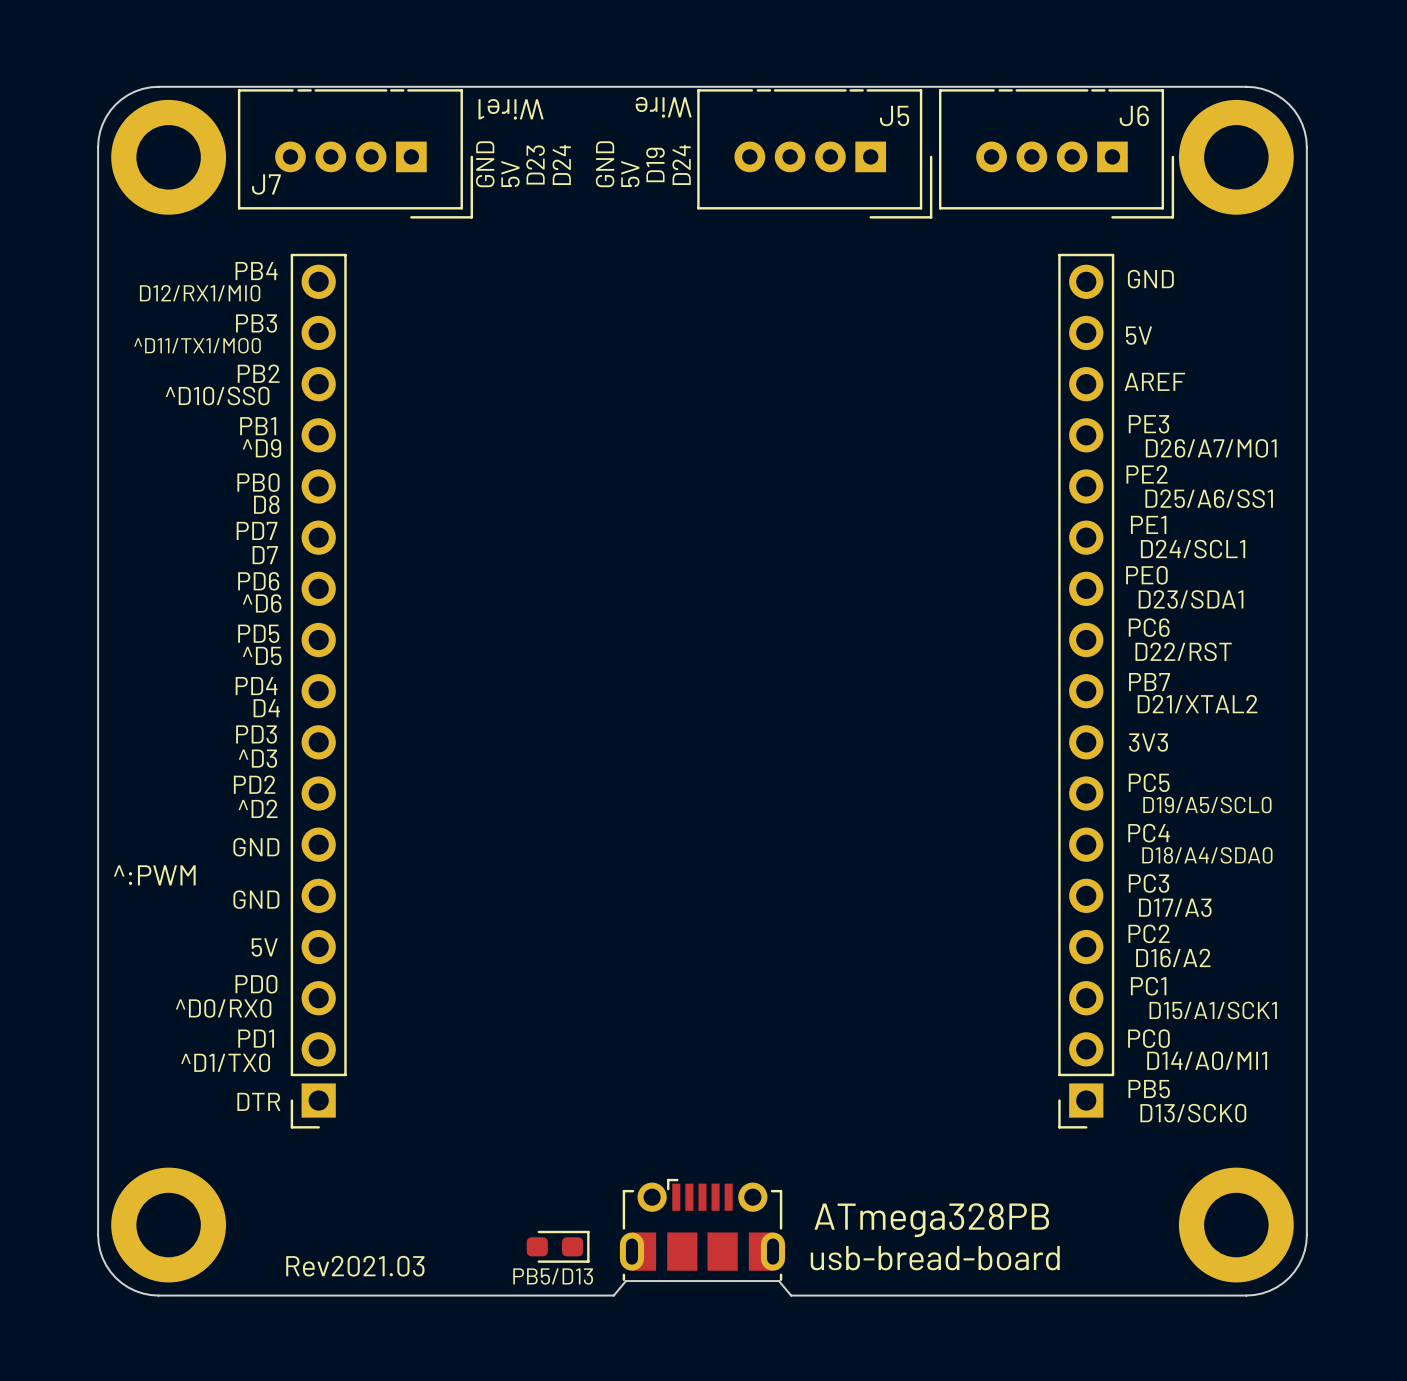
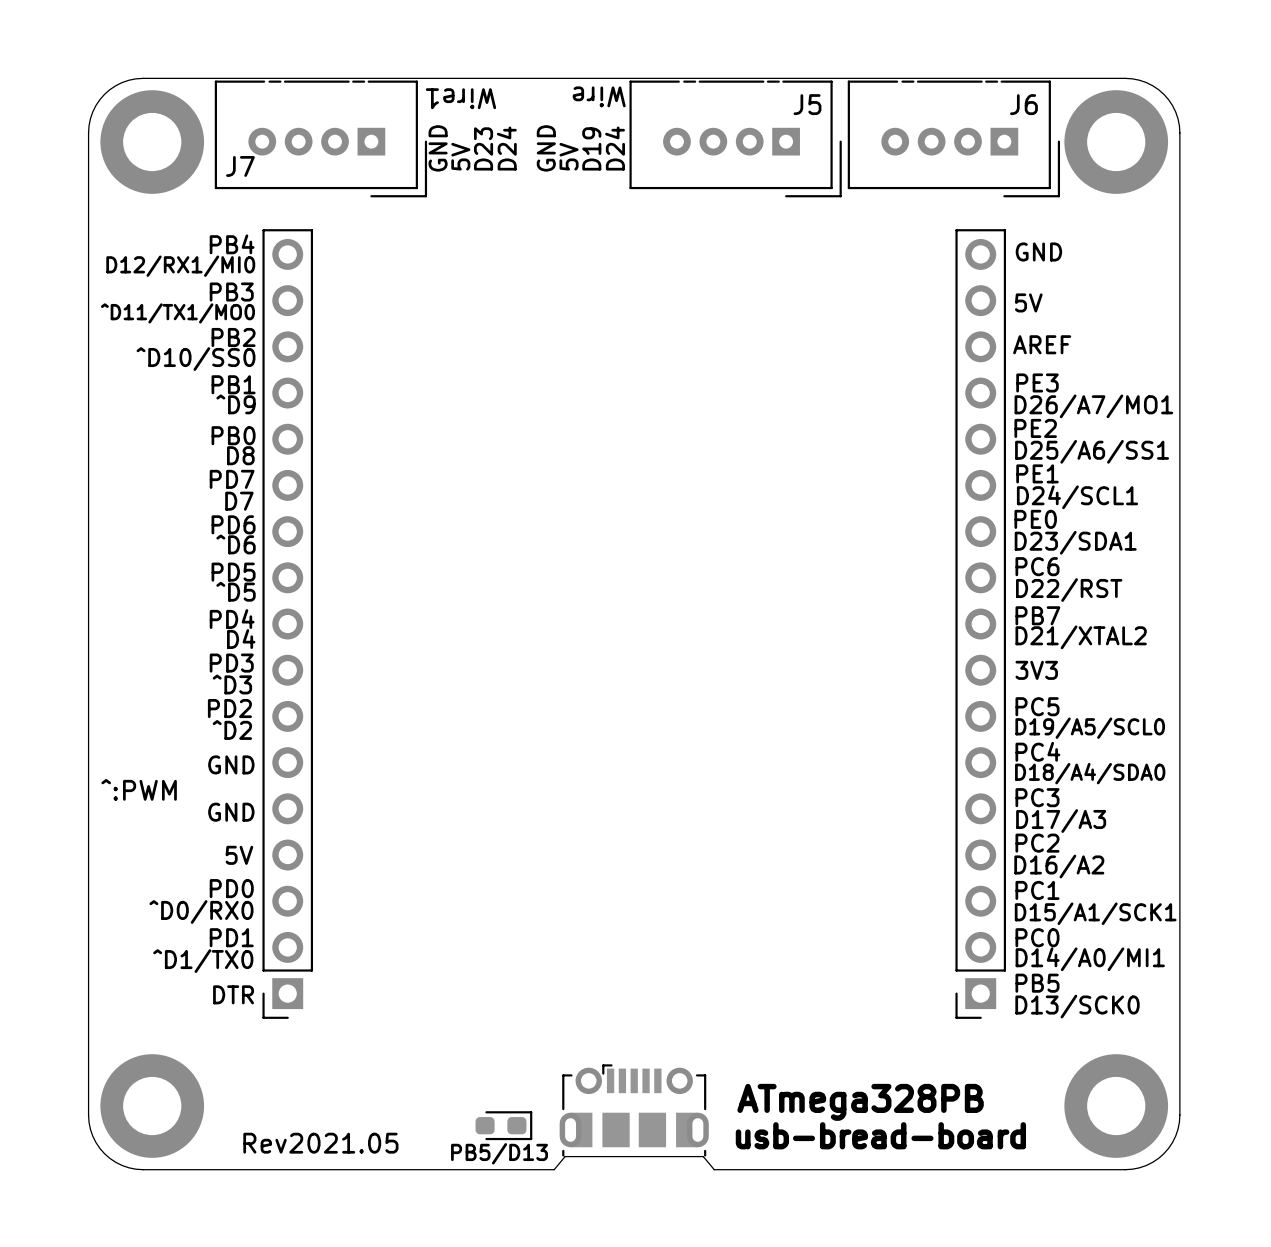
text: Rev2021.03 (355, 1266) -> Rev2021.05 (320, 1143)

